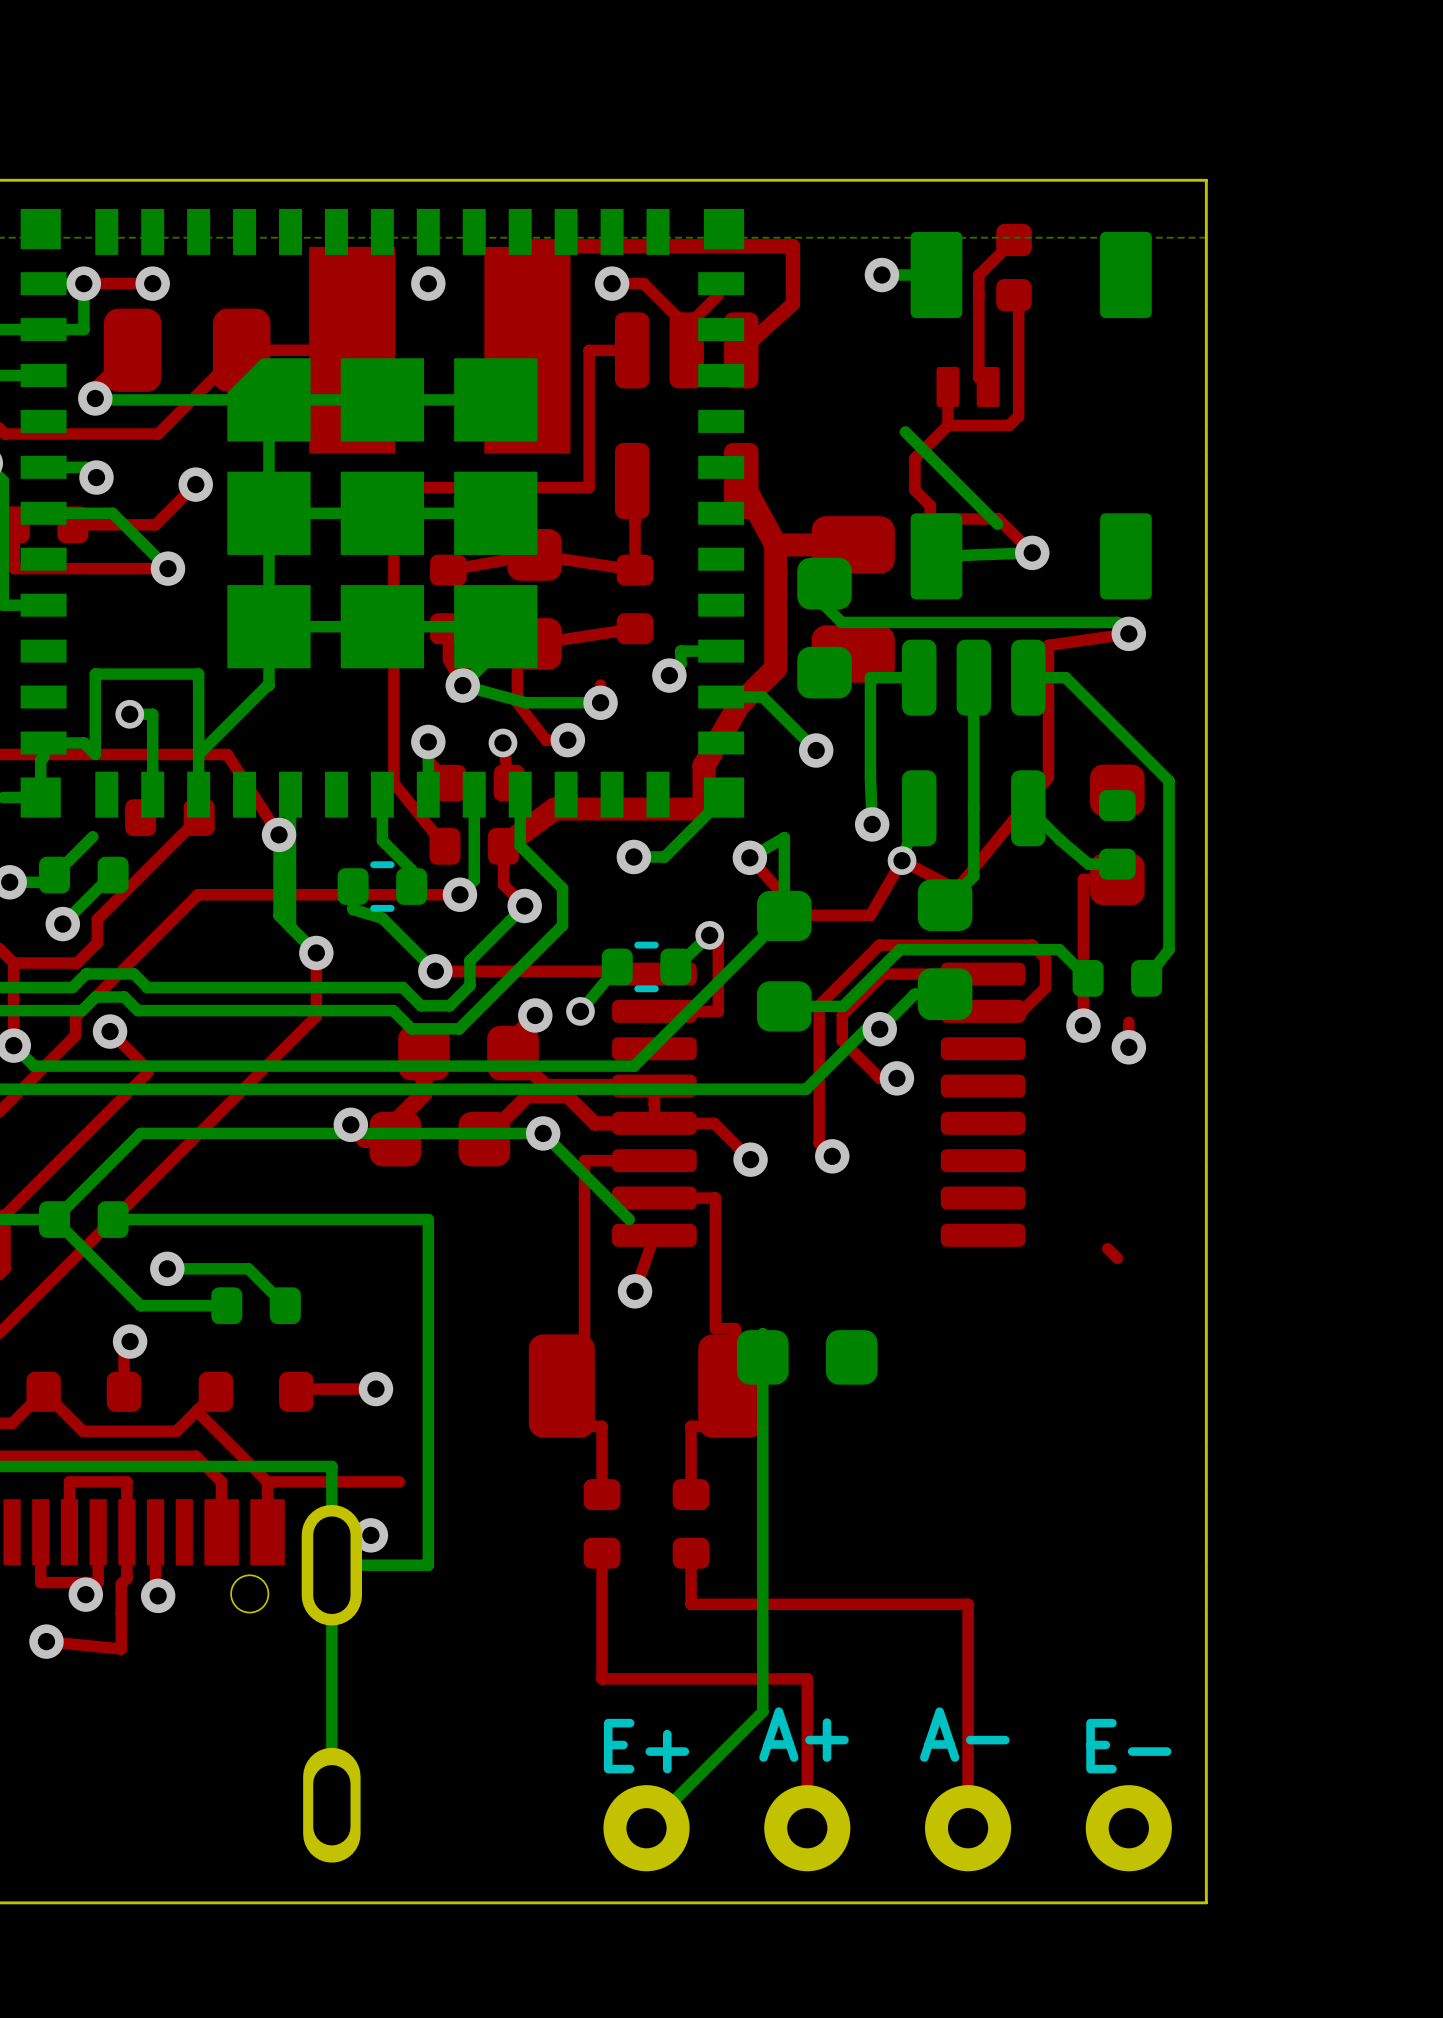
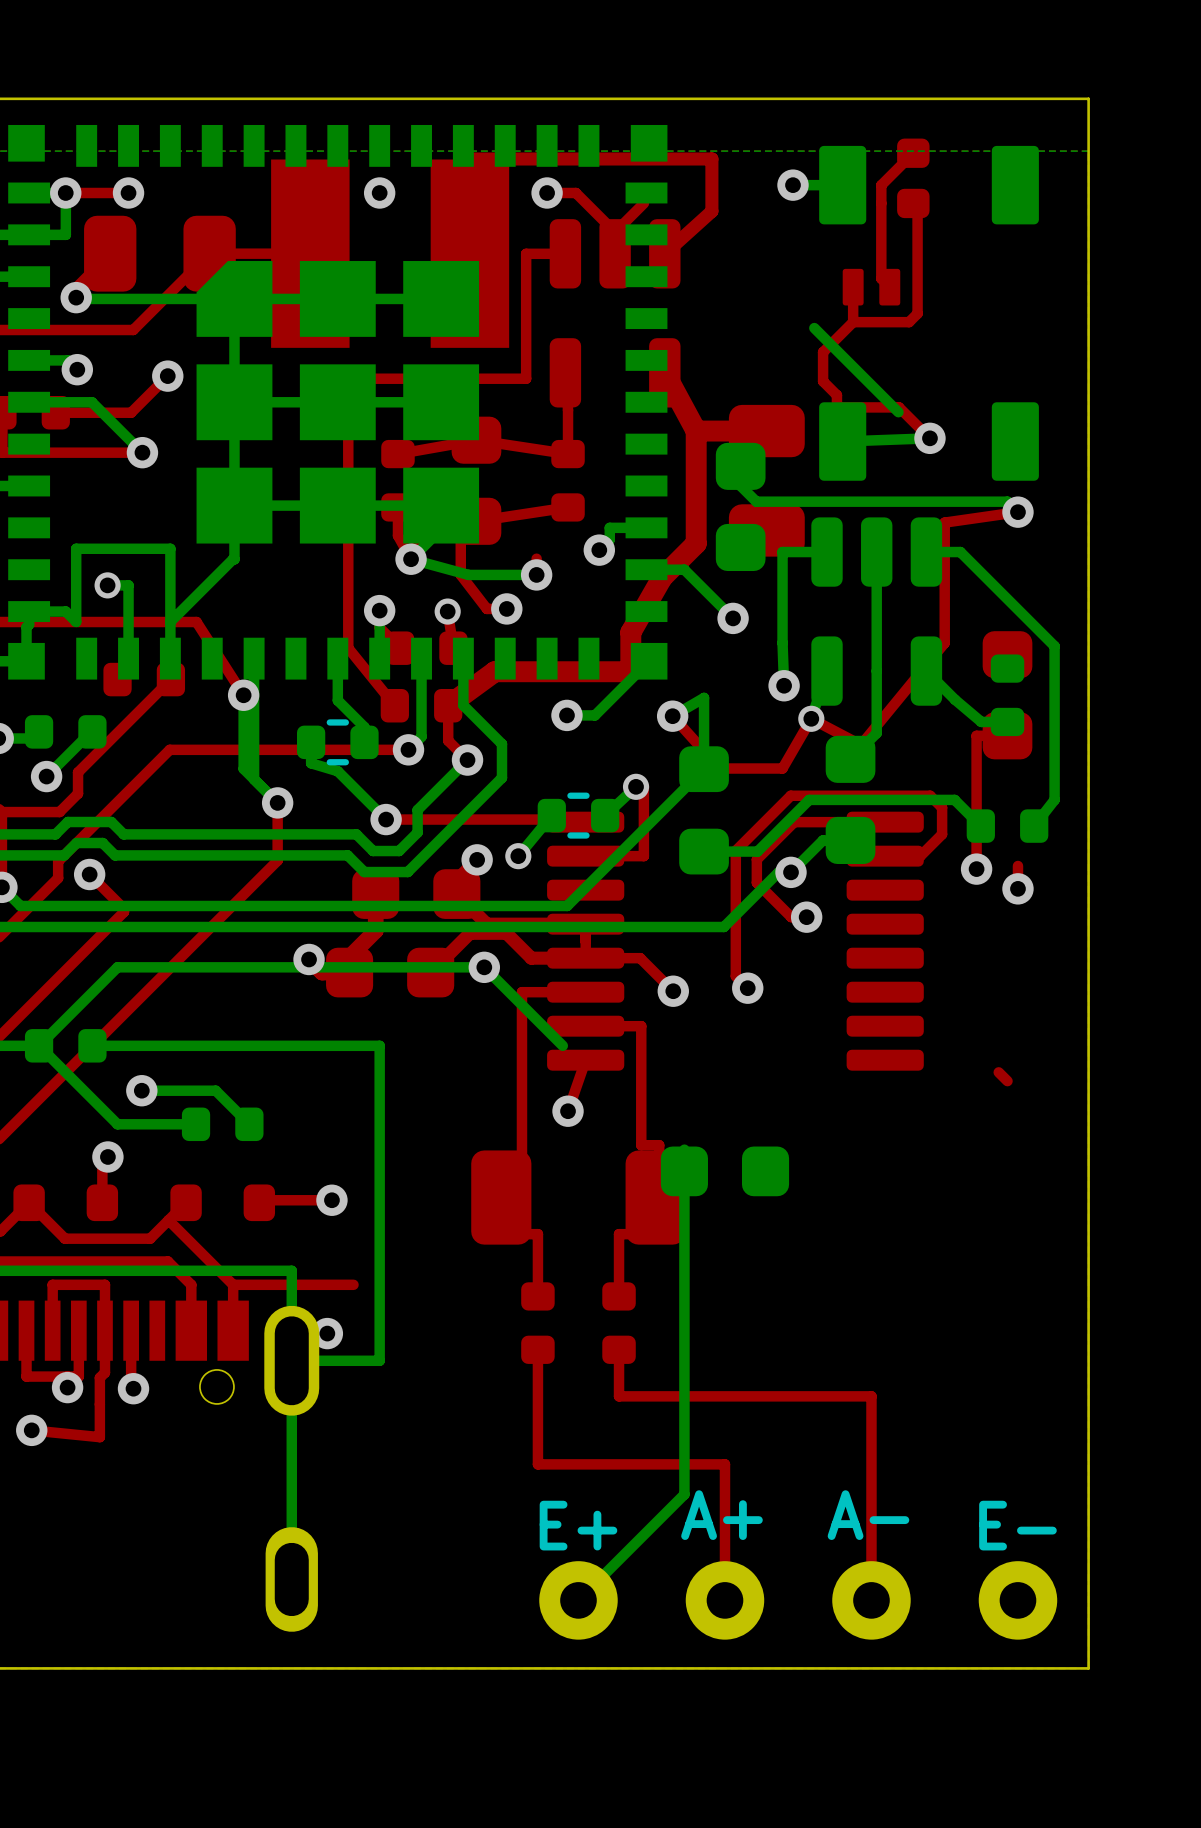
bottom track: (92, 836) (54, 875) -> none

